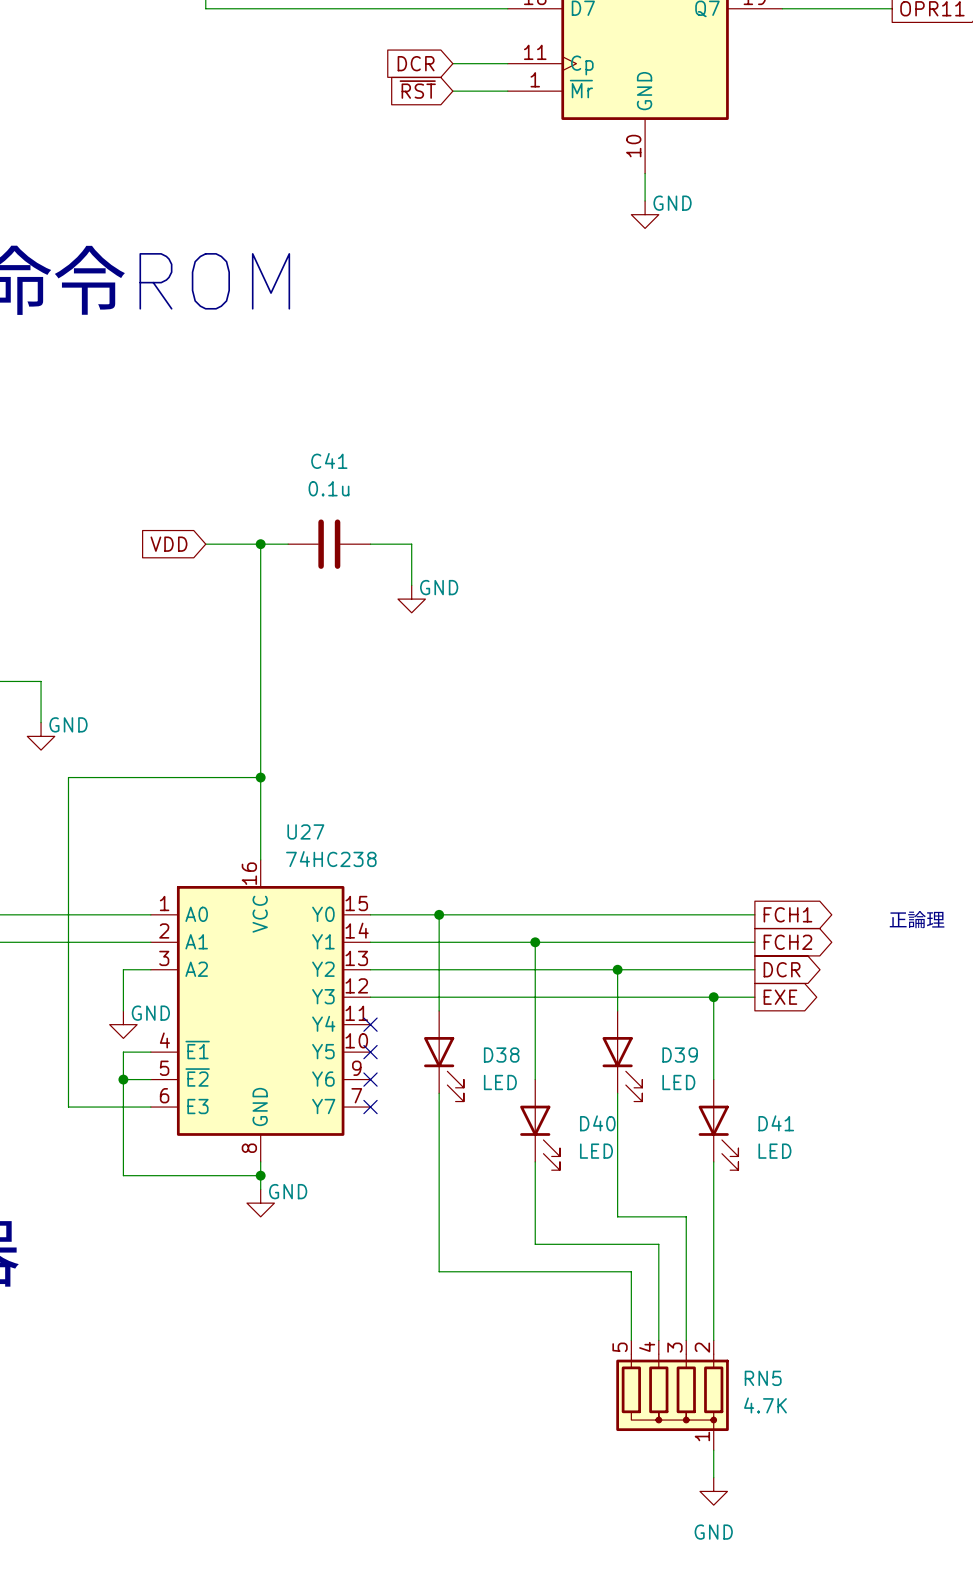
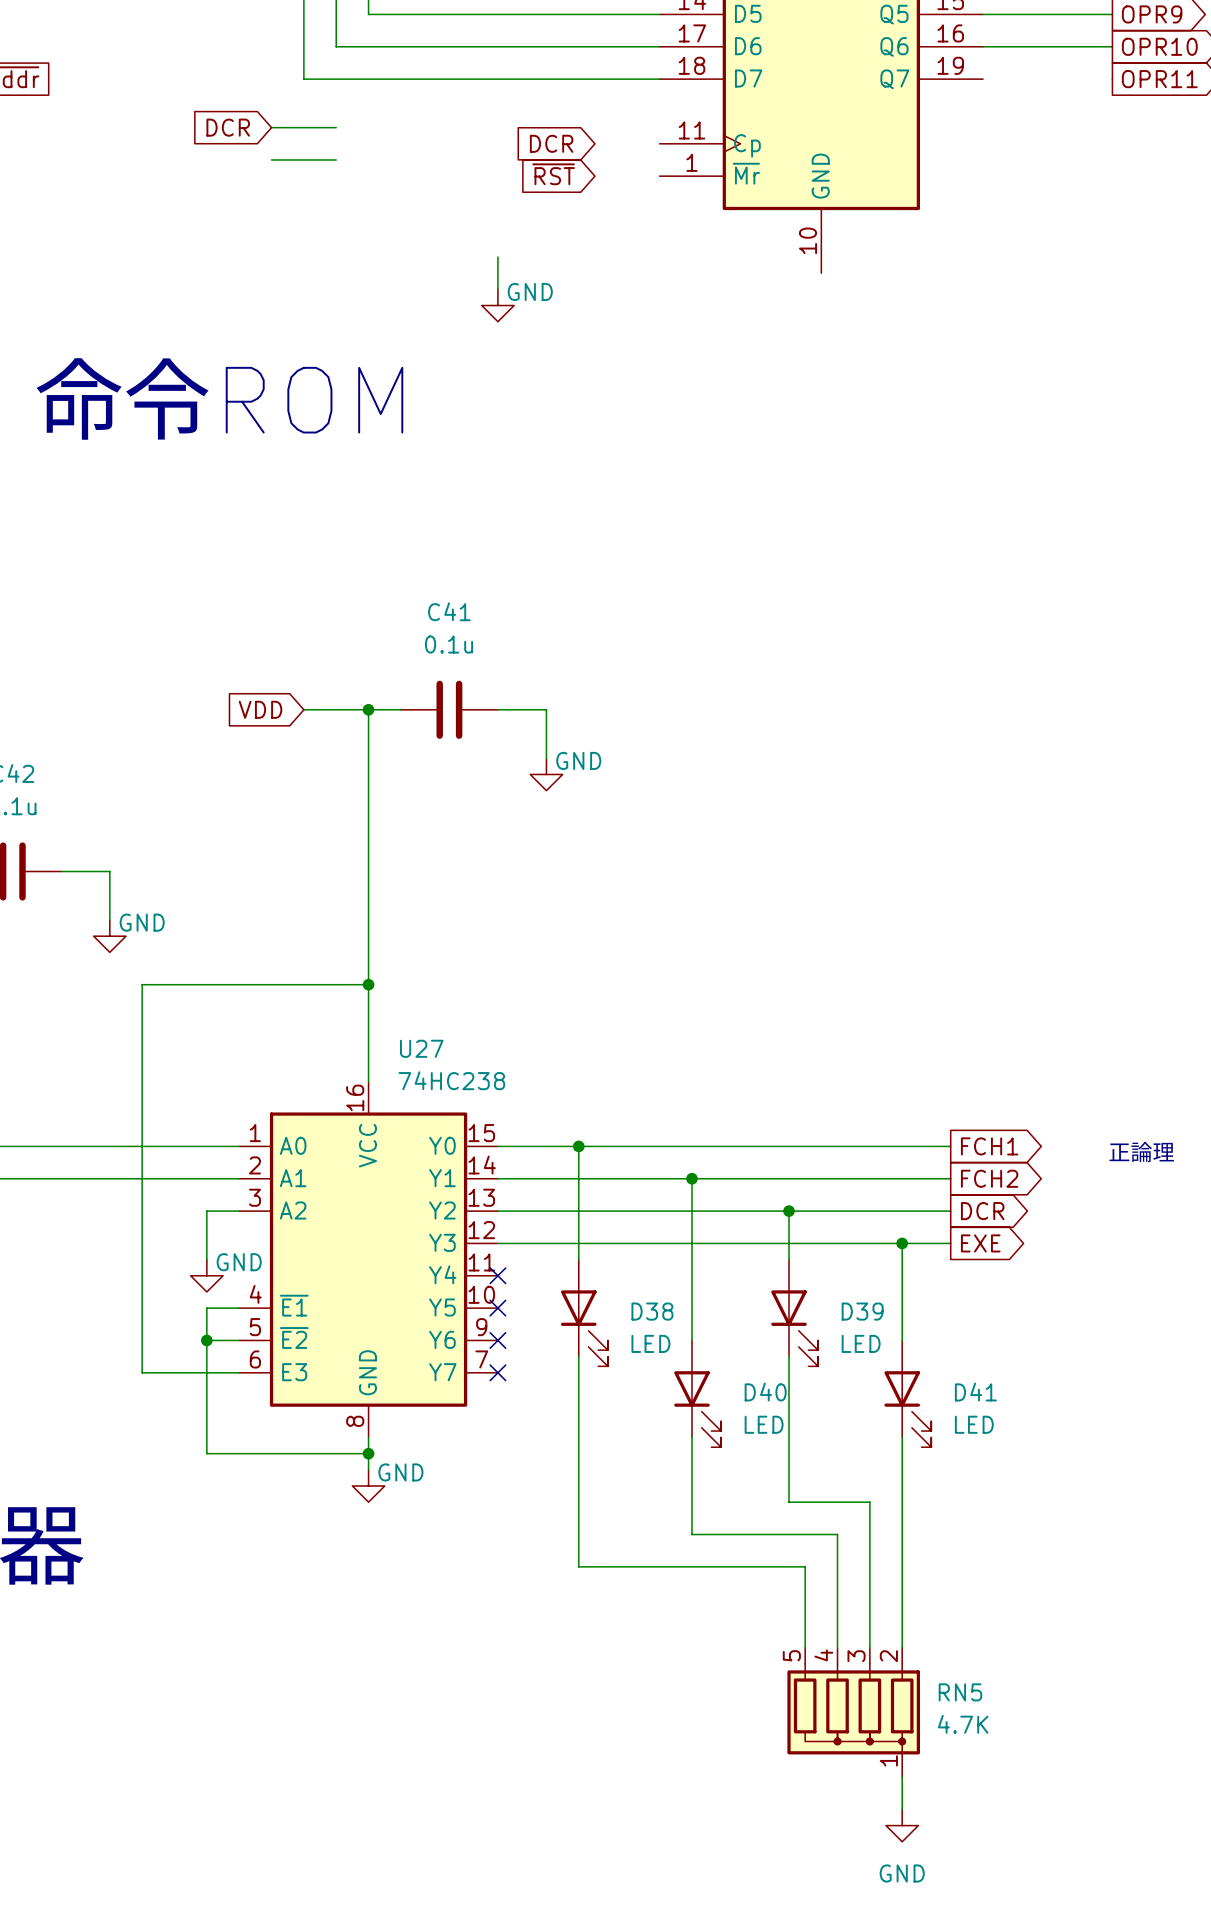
wire: (782, 8) (892, 8) -> none
global label: none -> DCR (228, 127)
wire: none -> (271, 127) (336, 127)
wire: (452, 63) (507, 63) -> none
wire: none -> (271, 159) (336, 159)
wire: (452, 91) (507, 91) -> none
wire: none -> (497, 257) (497, 289)
wire: (645, 173) (645, 200) -> none
power symbol: none -> GND (497, 305)
power symbol: GND (645, 214) -> none

